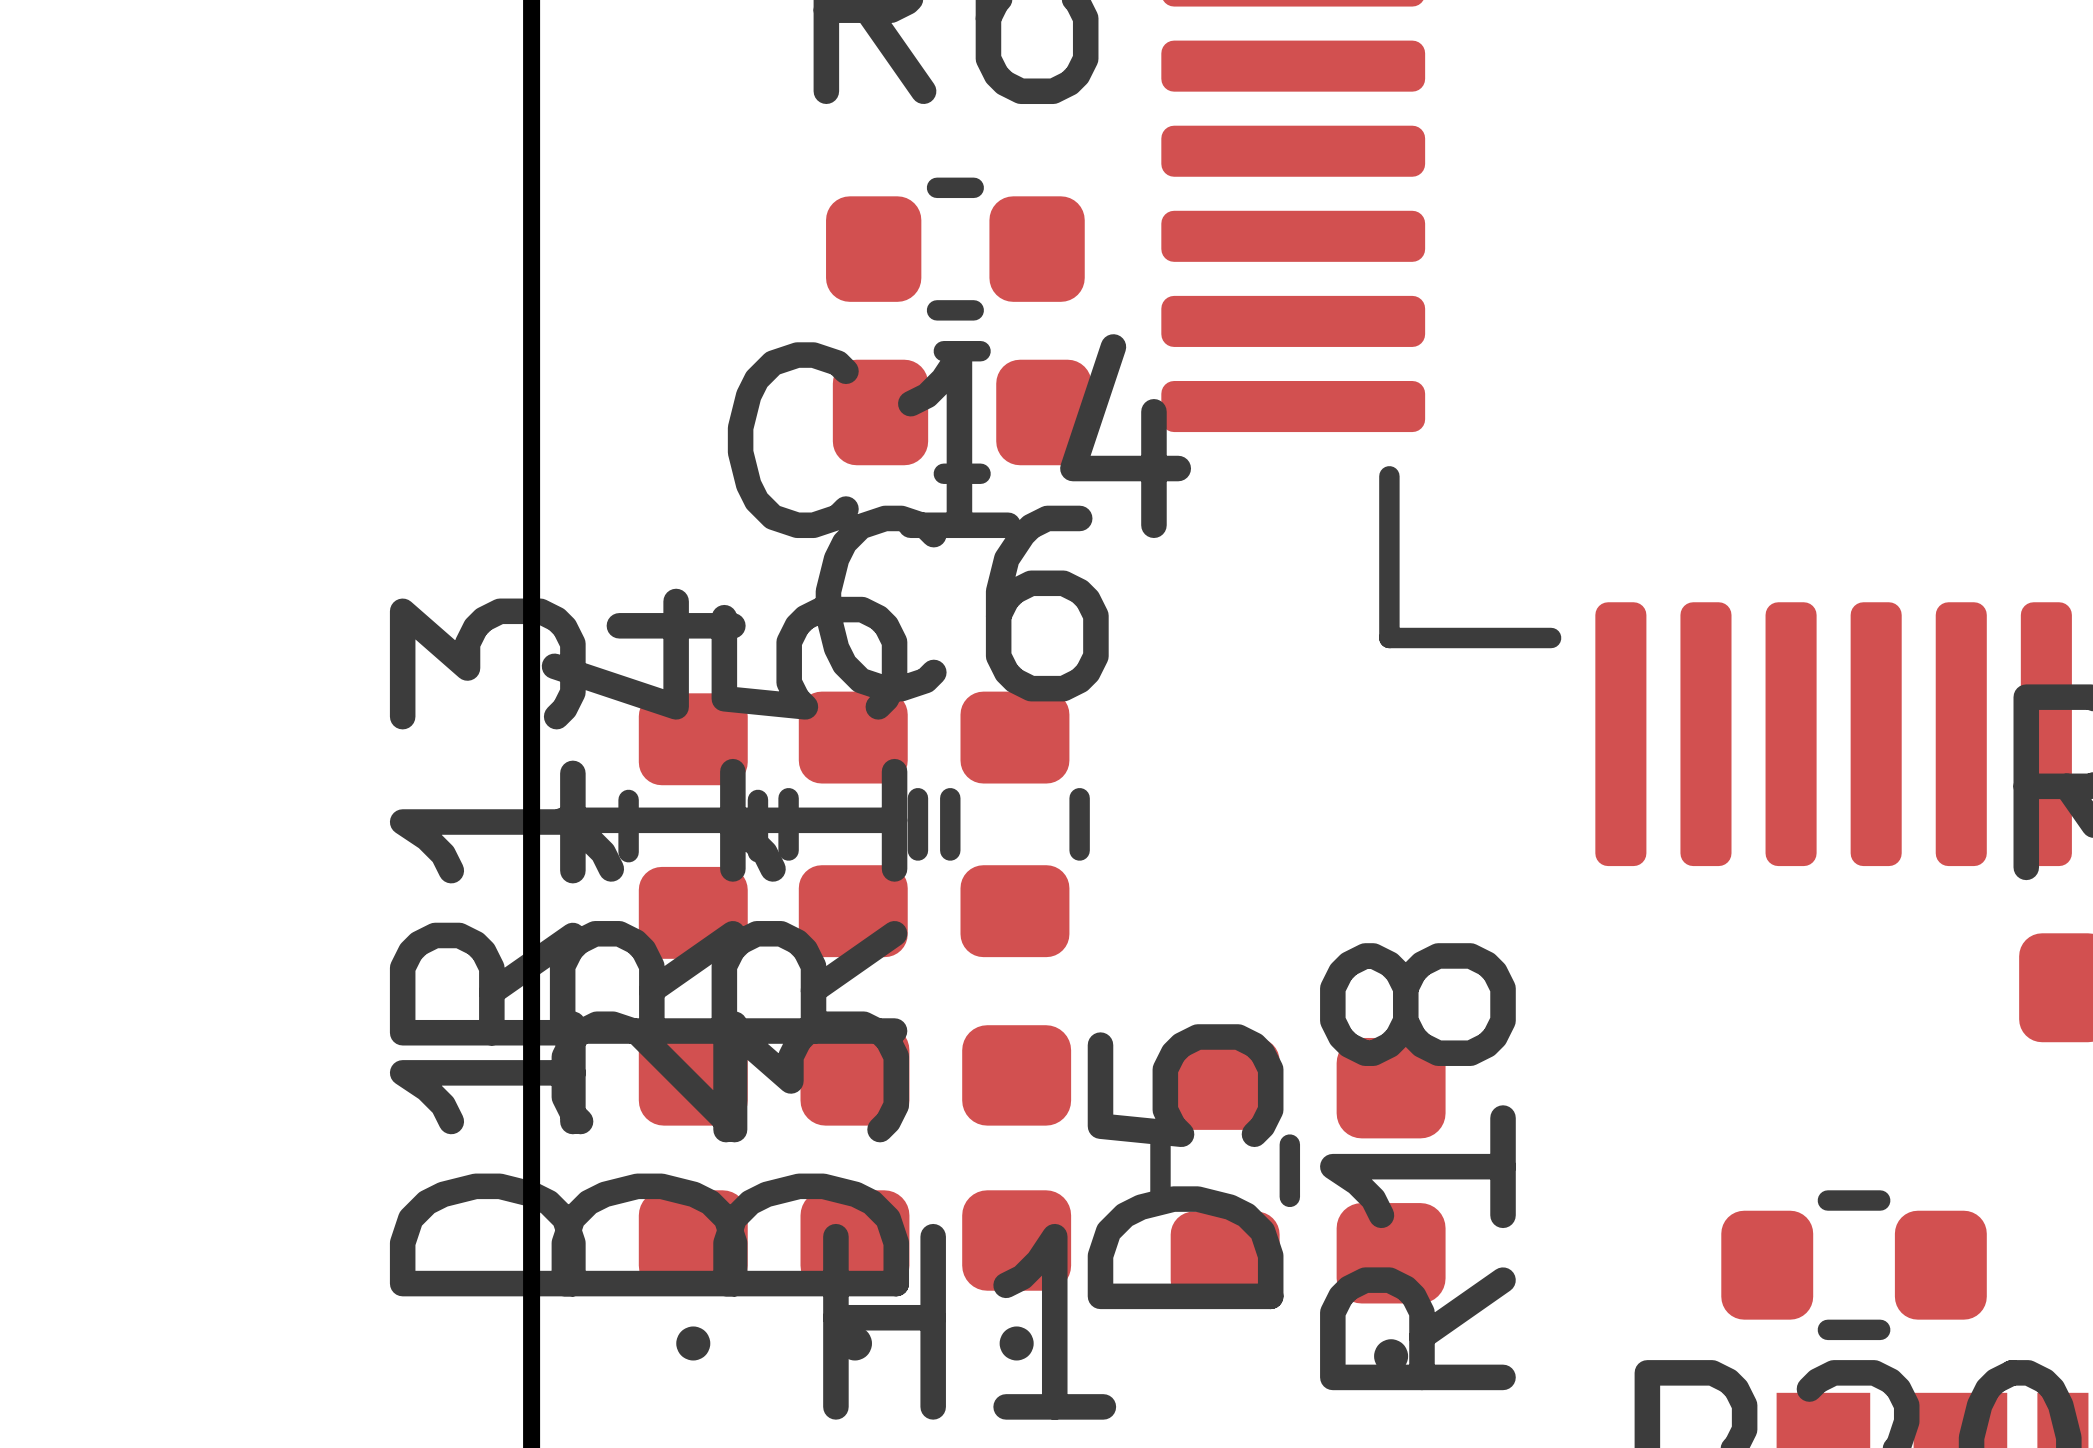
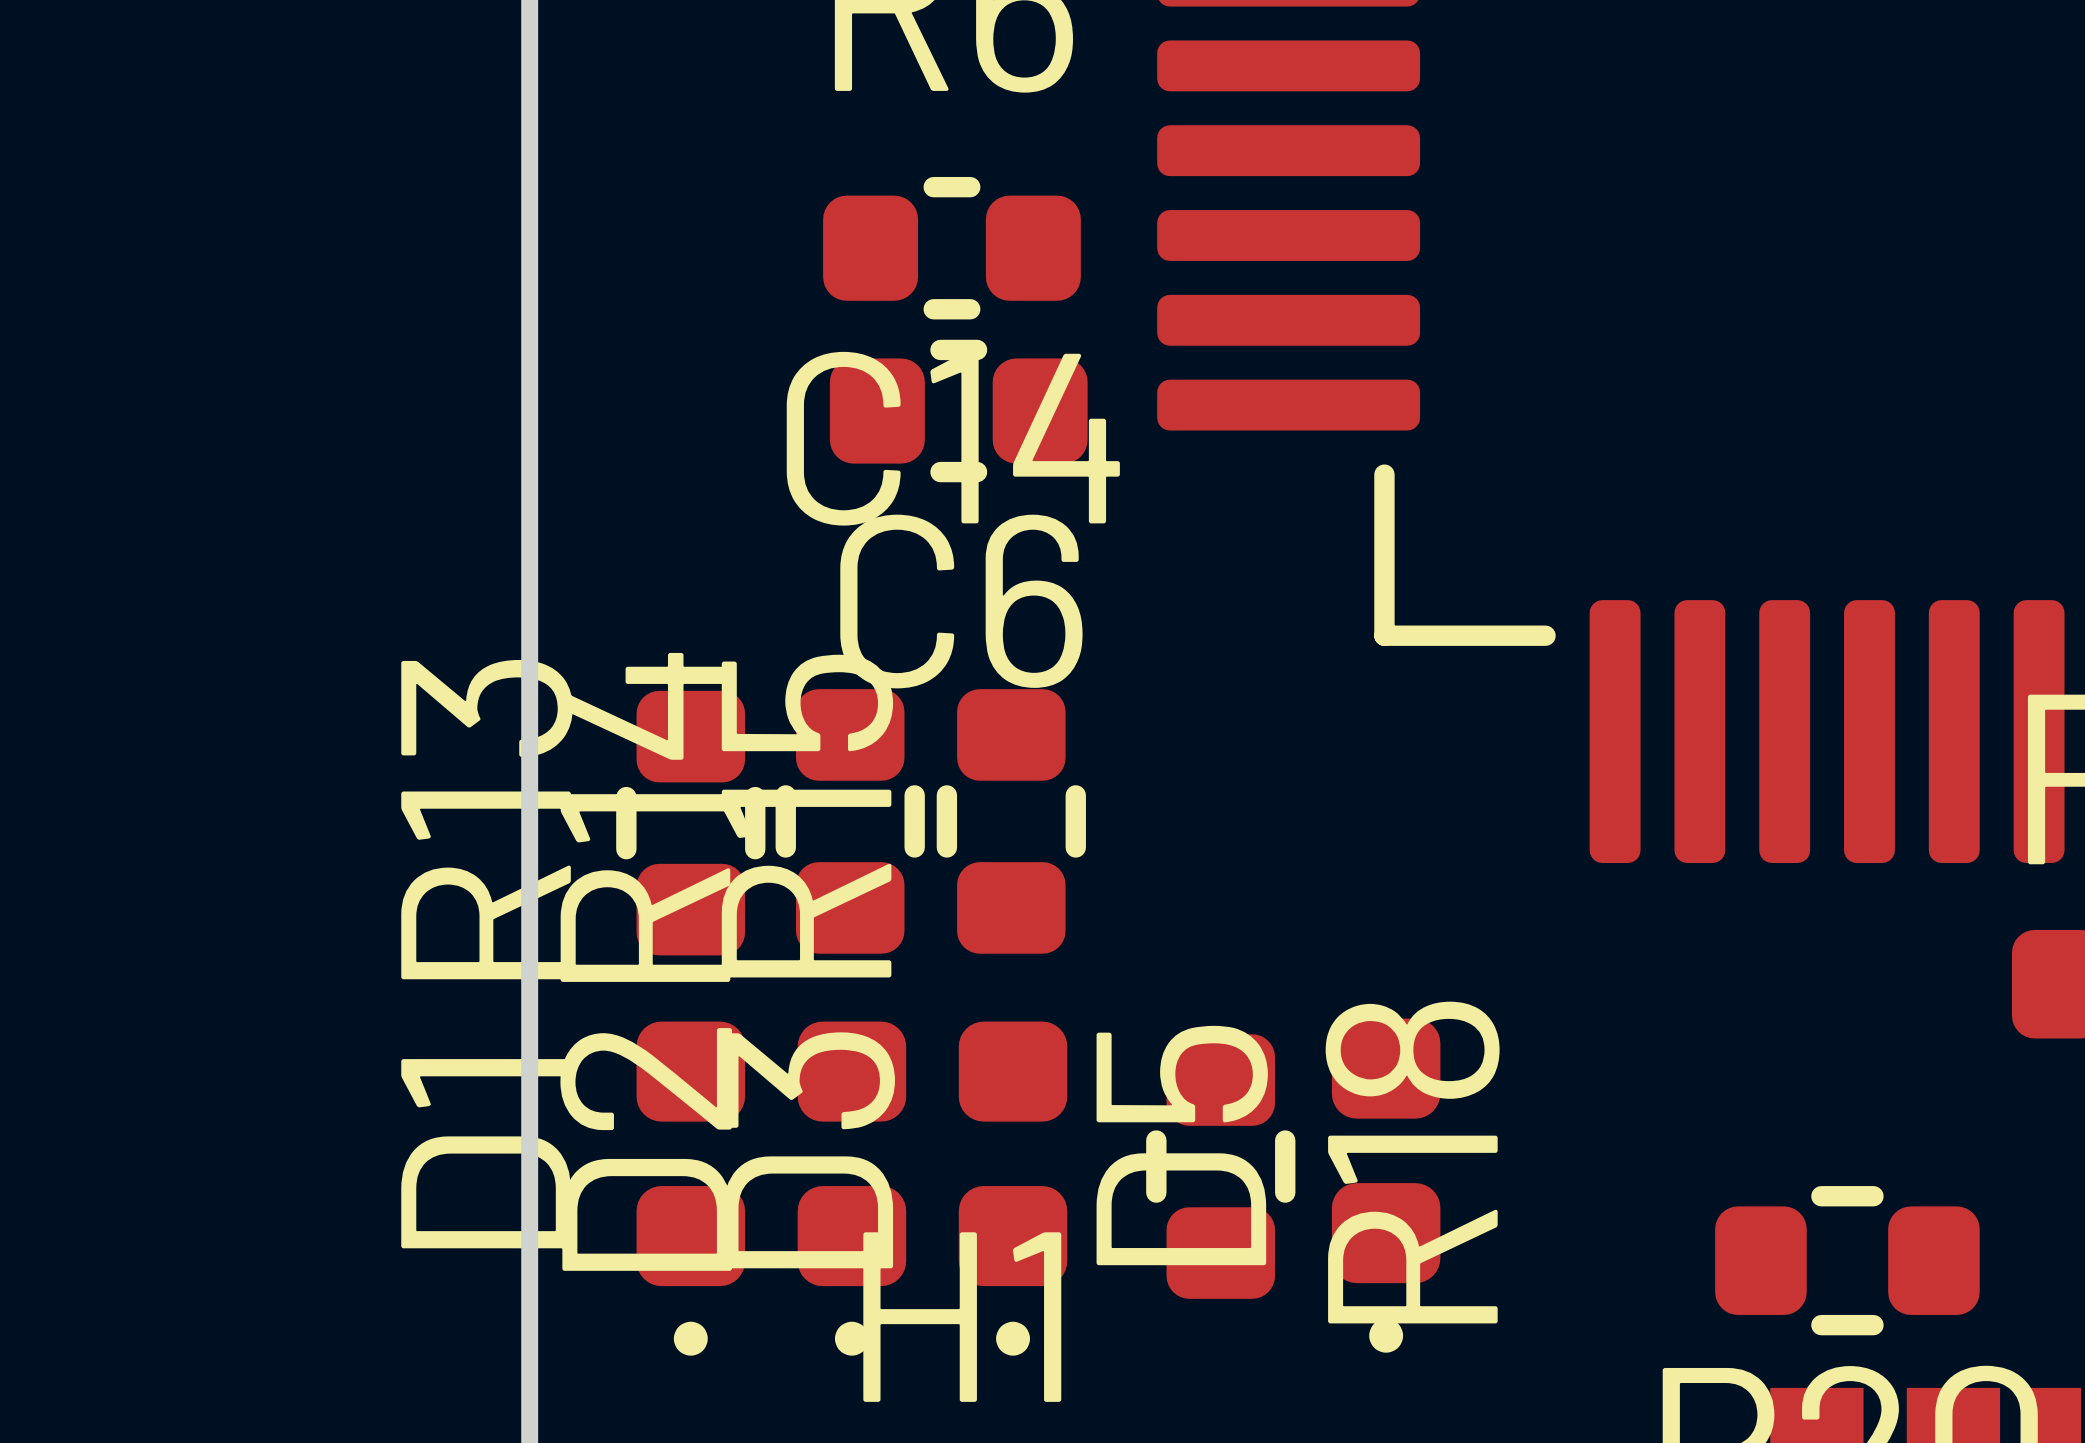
D5 position: (1391, 1205) -> (1386, 1185)

